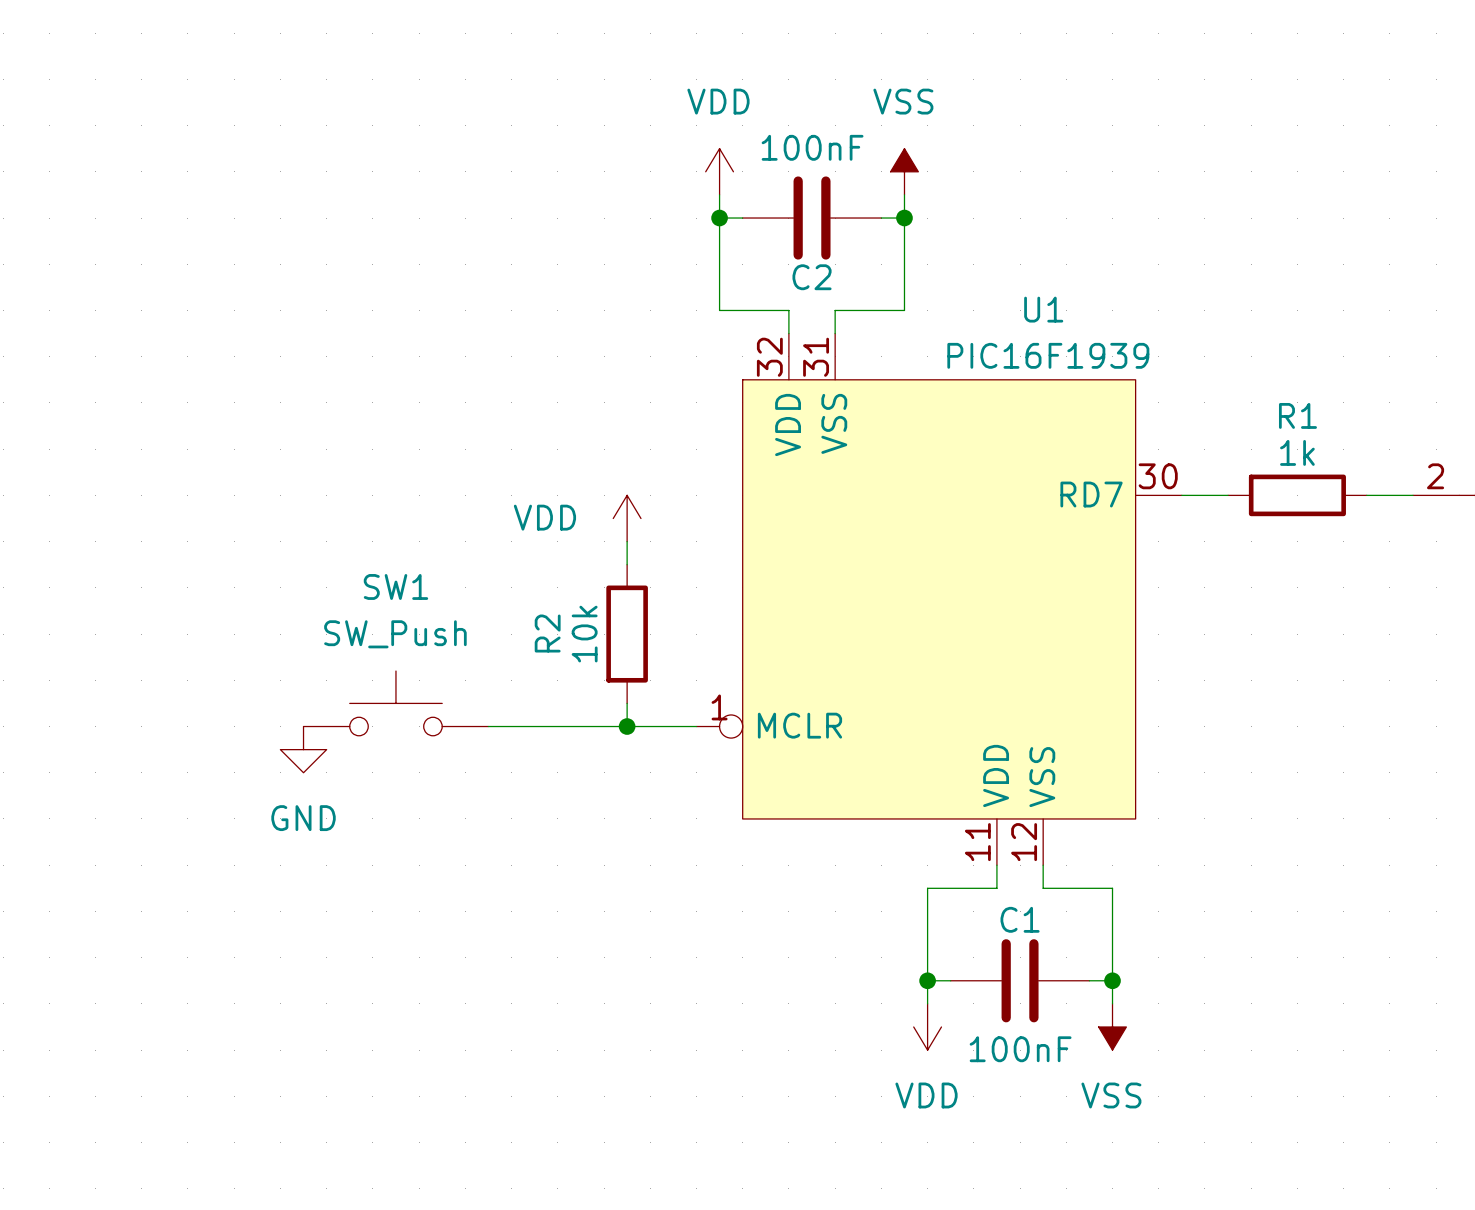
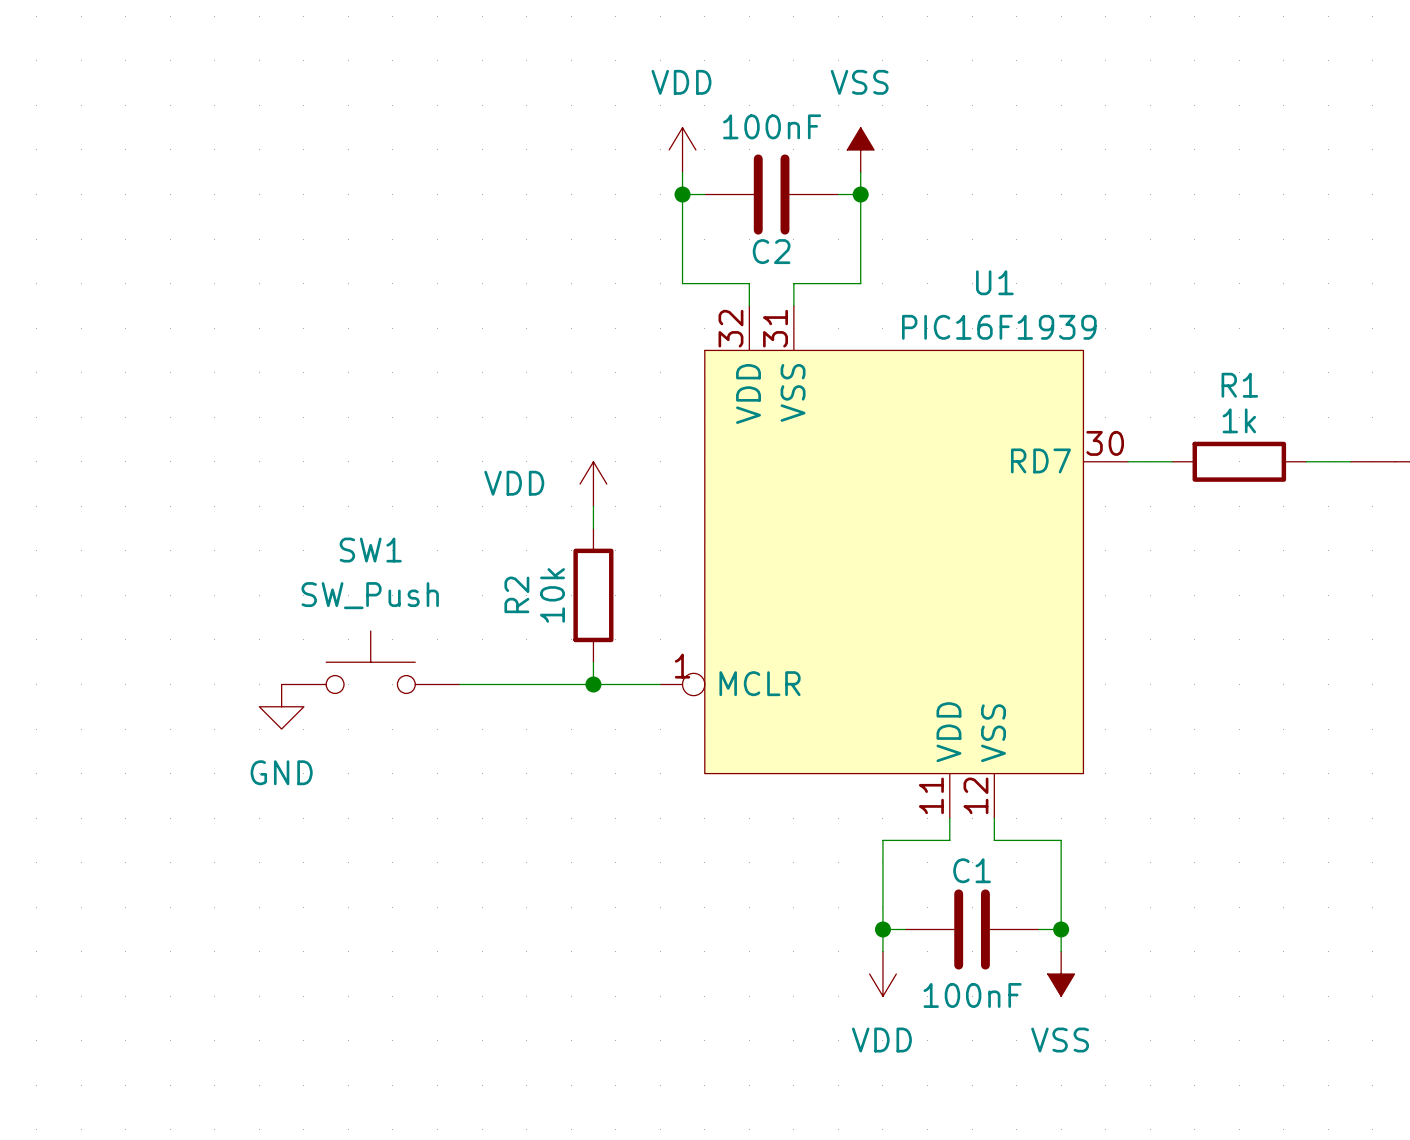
part pin number: 2 (1435, 476) -> none

